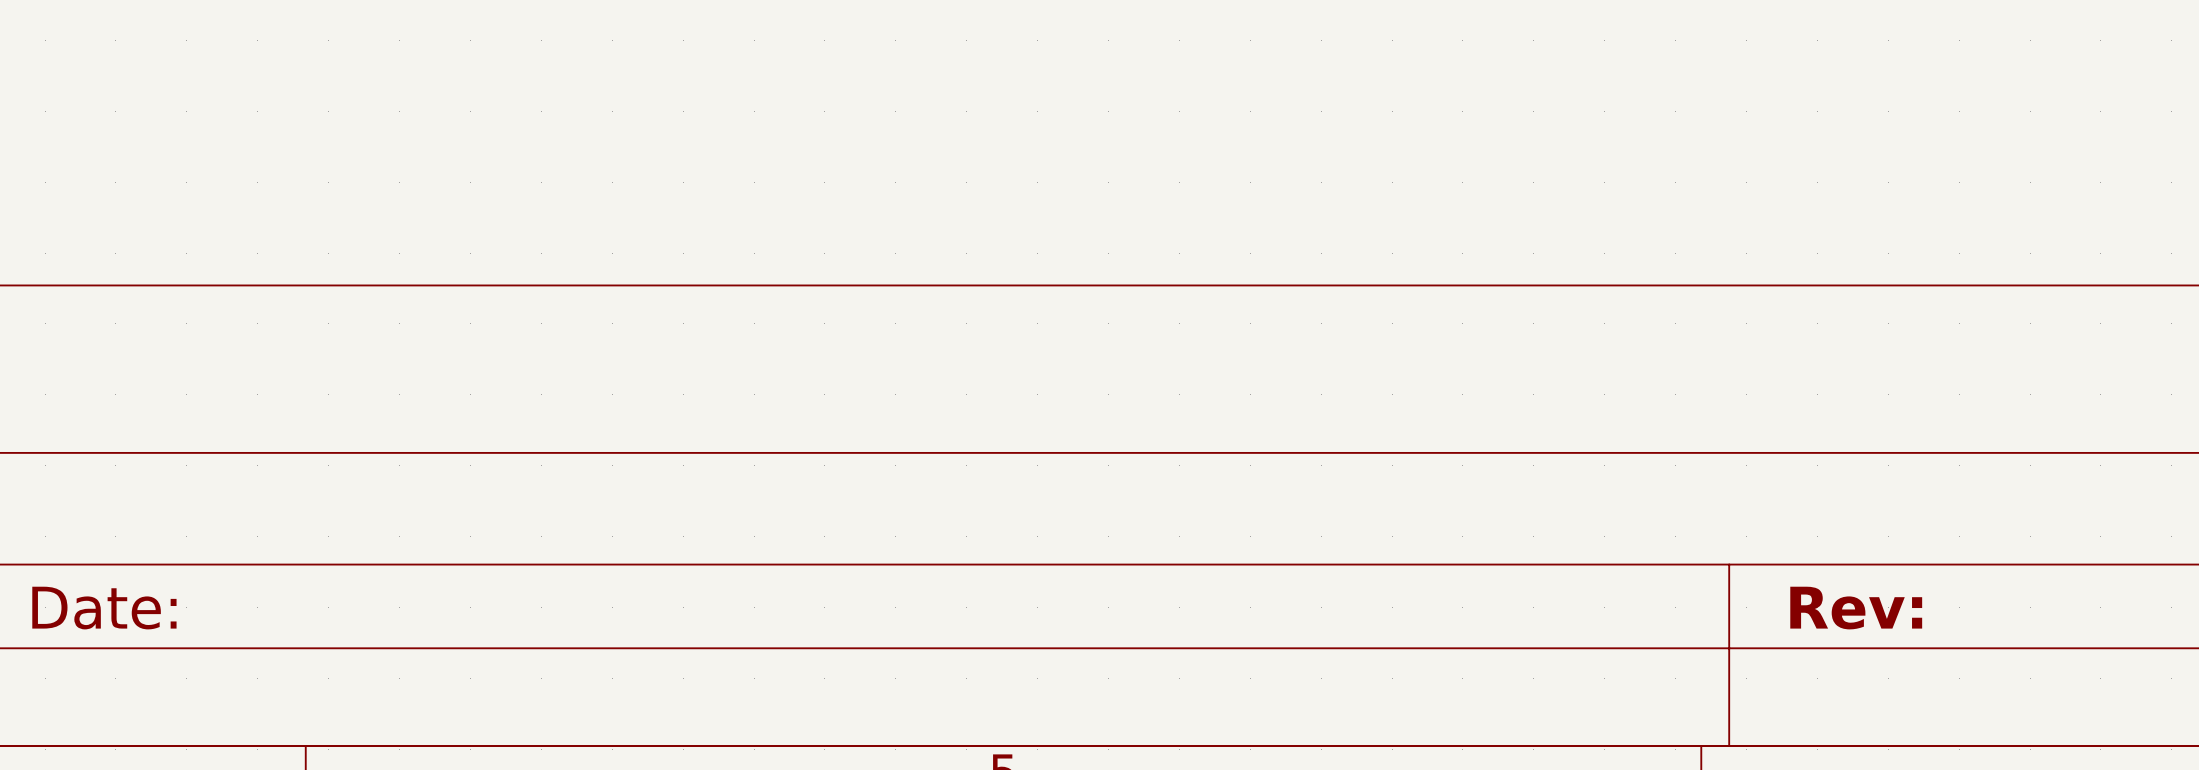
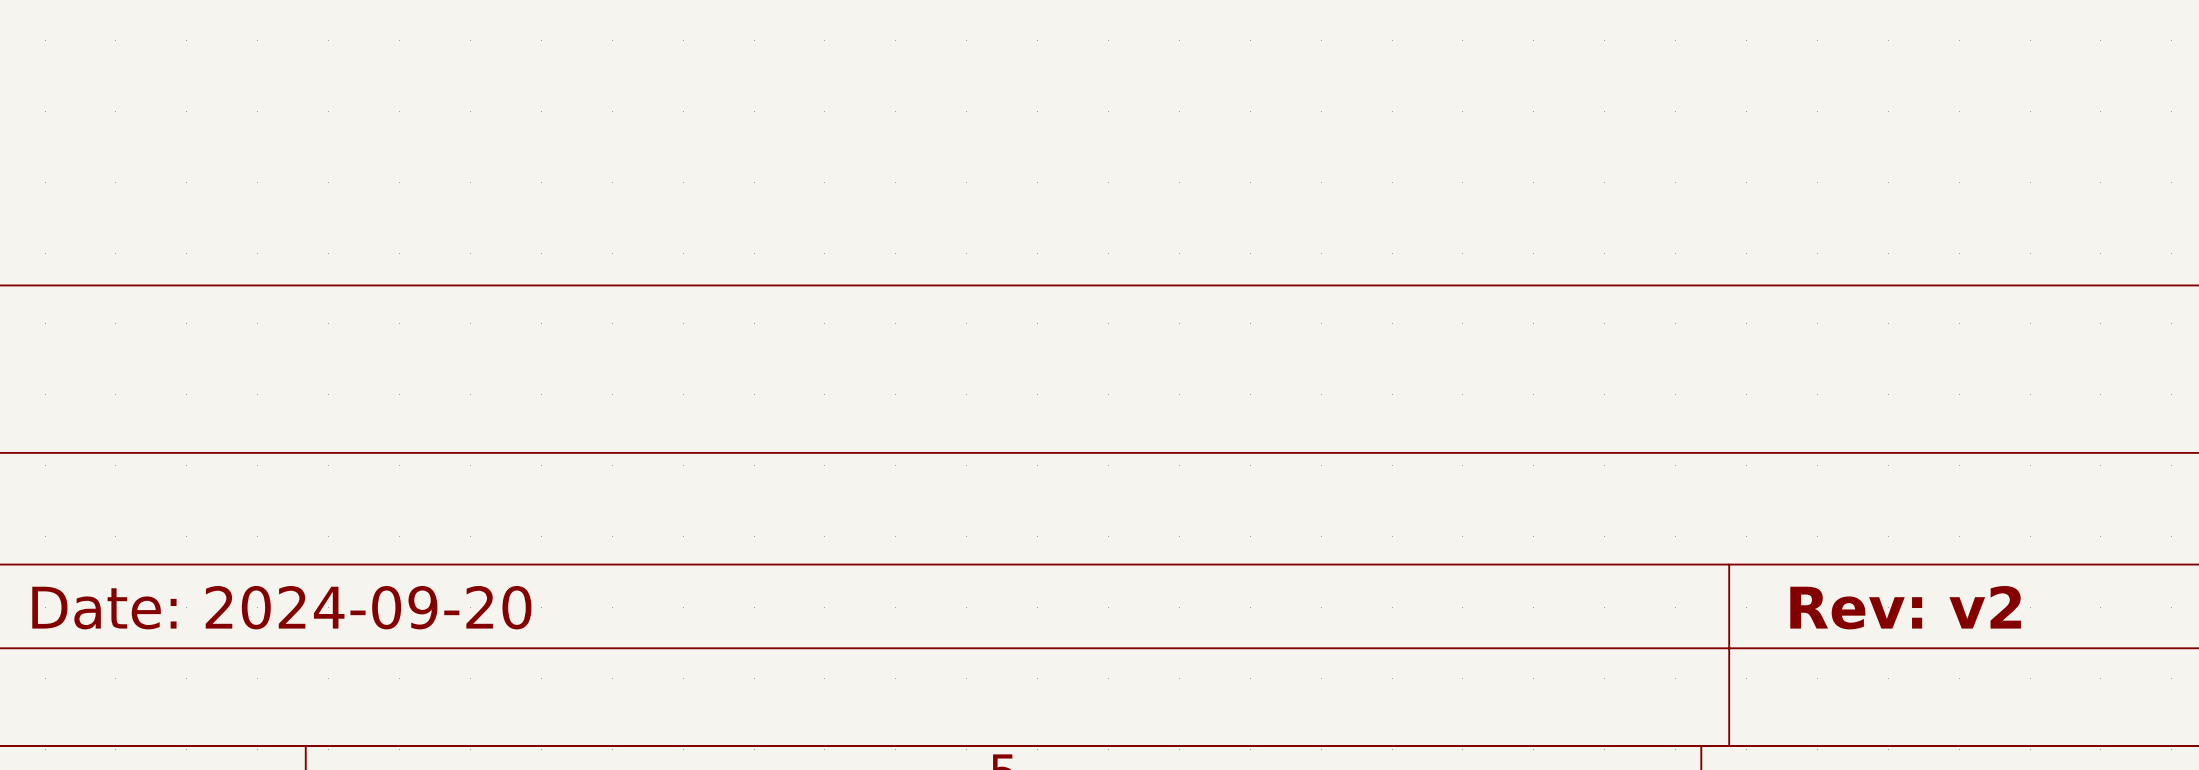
title block: Date: (104, 608) -> Date: 2024-09-20 (281, 607)
title block: Rev: (1856, 608) -> Rev: v2 (1905, 607)

